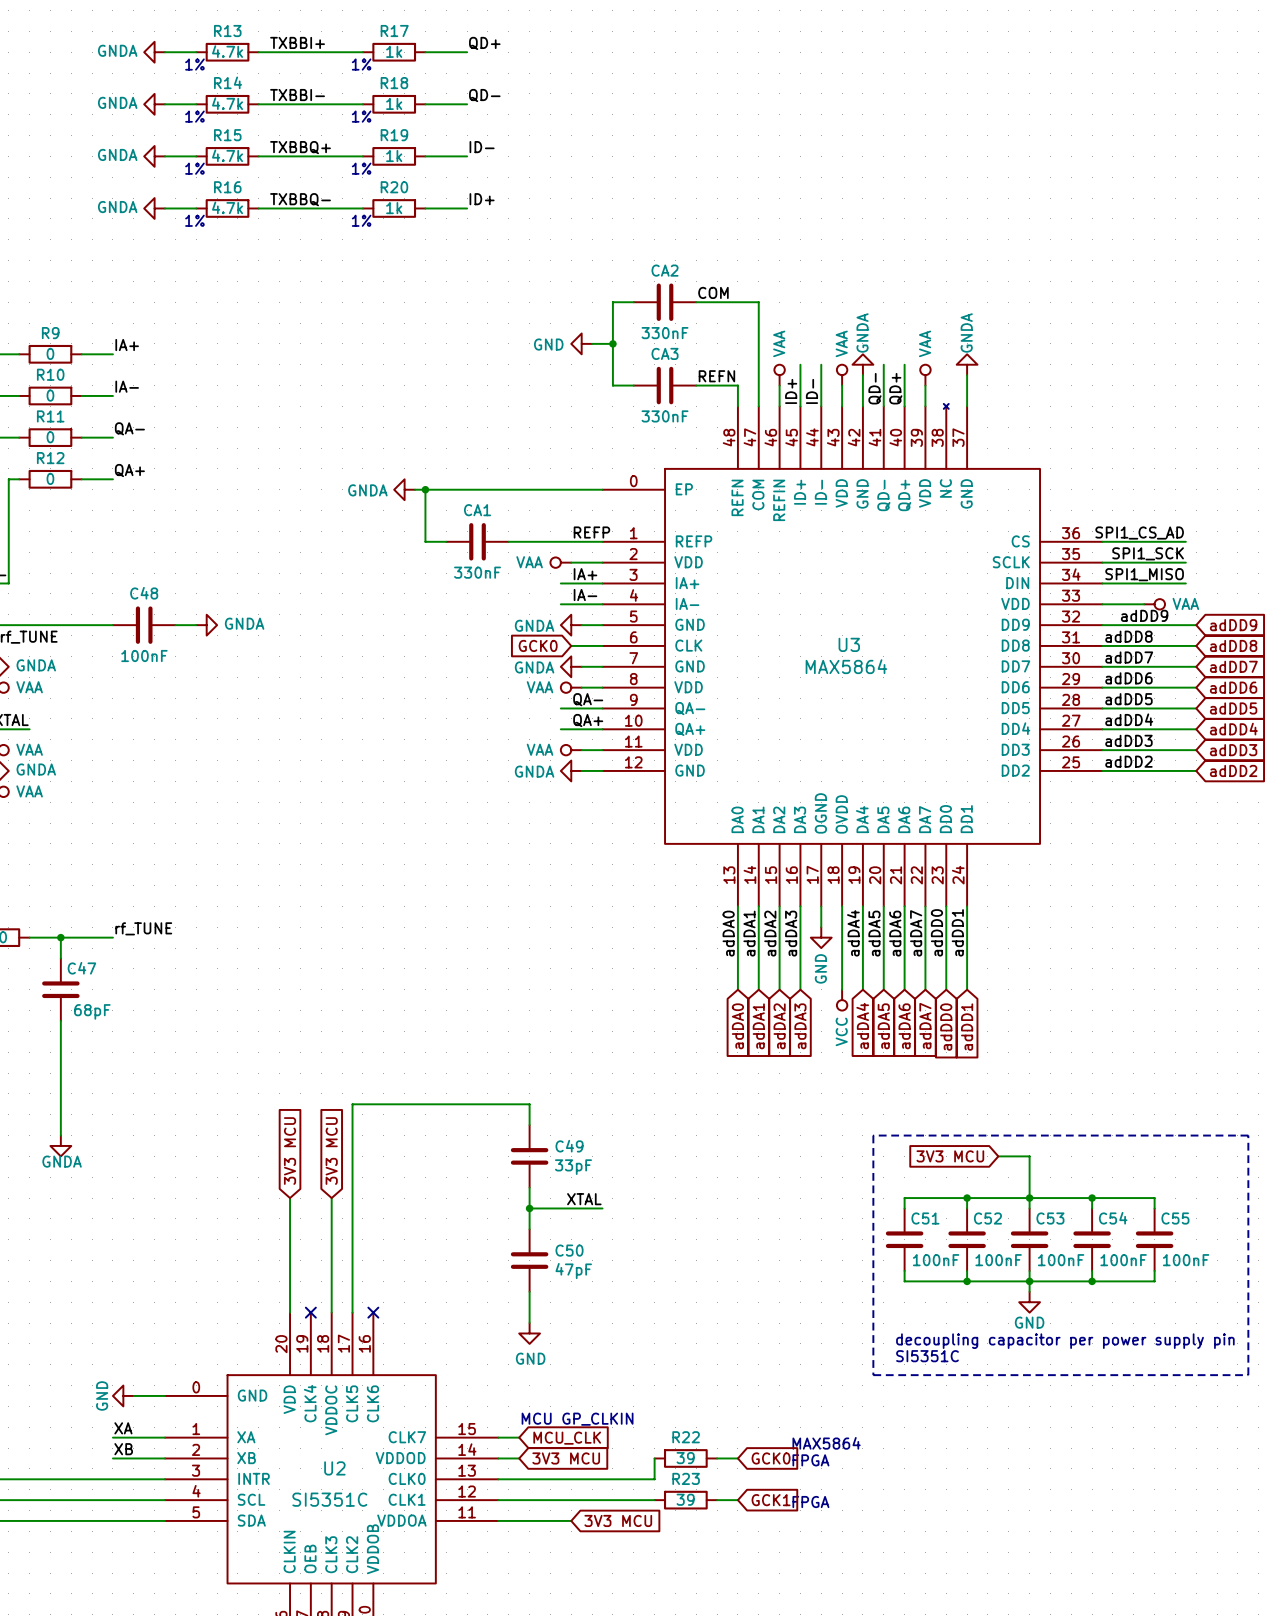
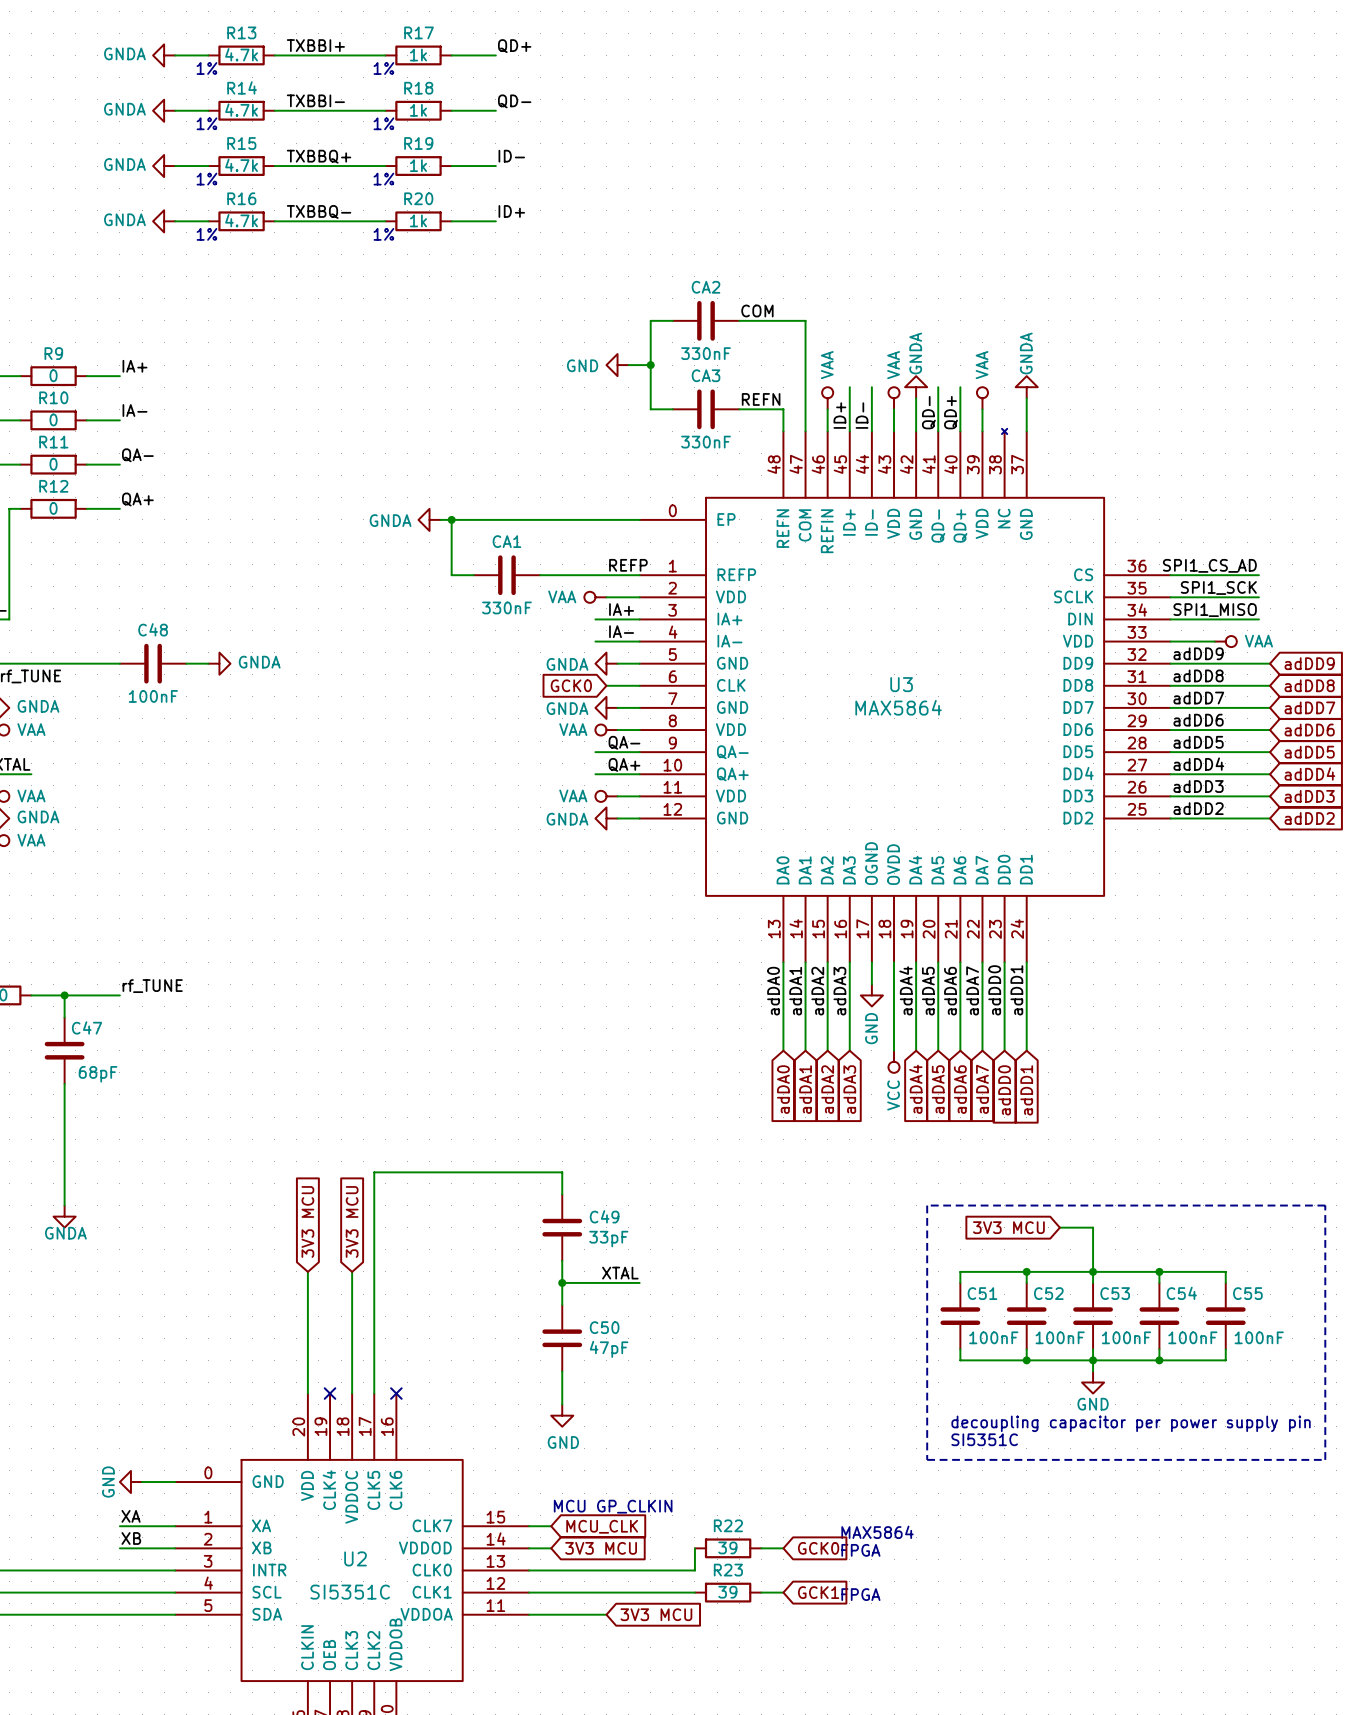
label position: adDD9 (1144, 615) -> adDD9 (1198, 653)

